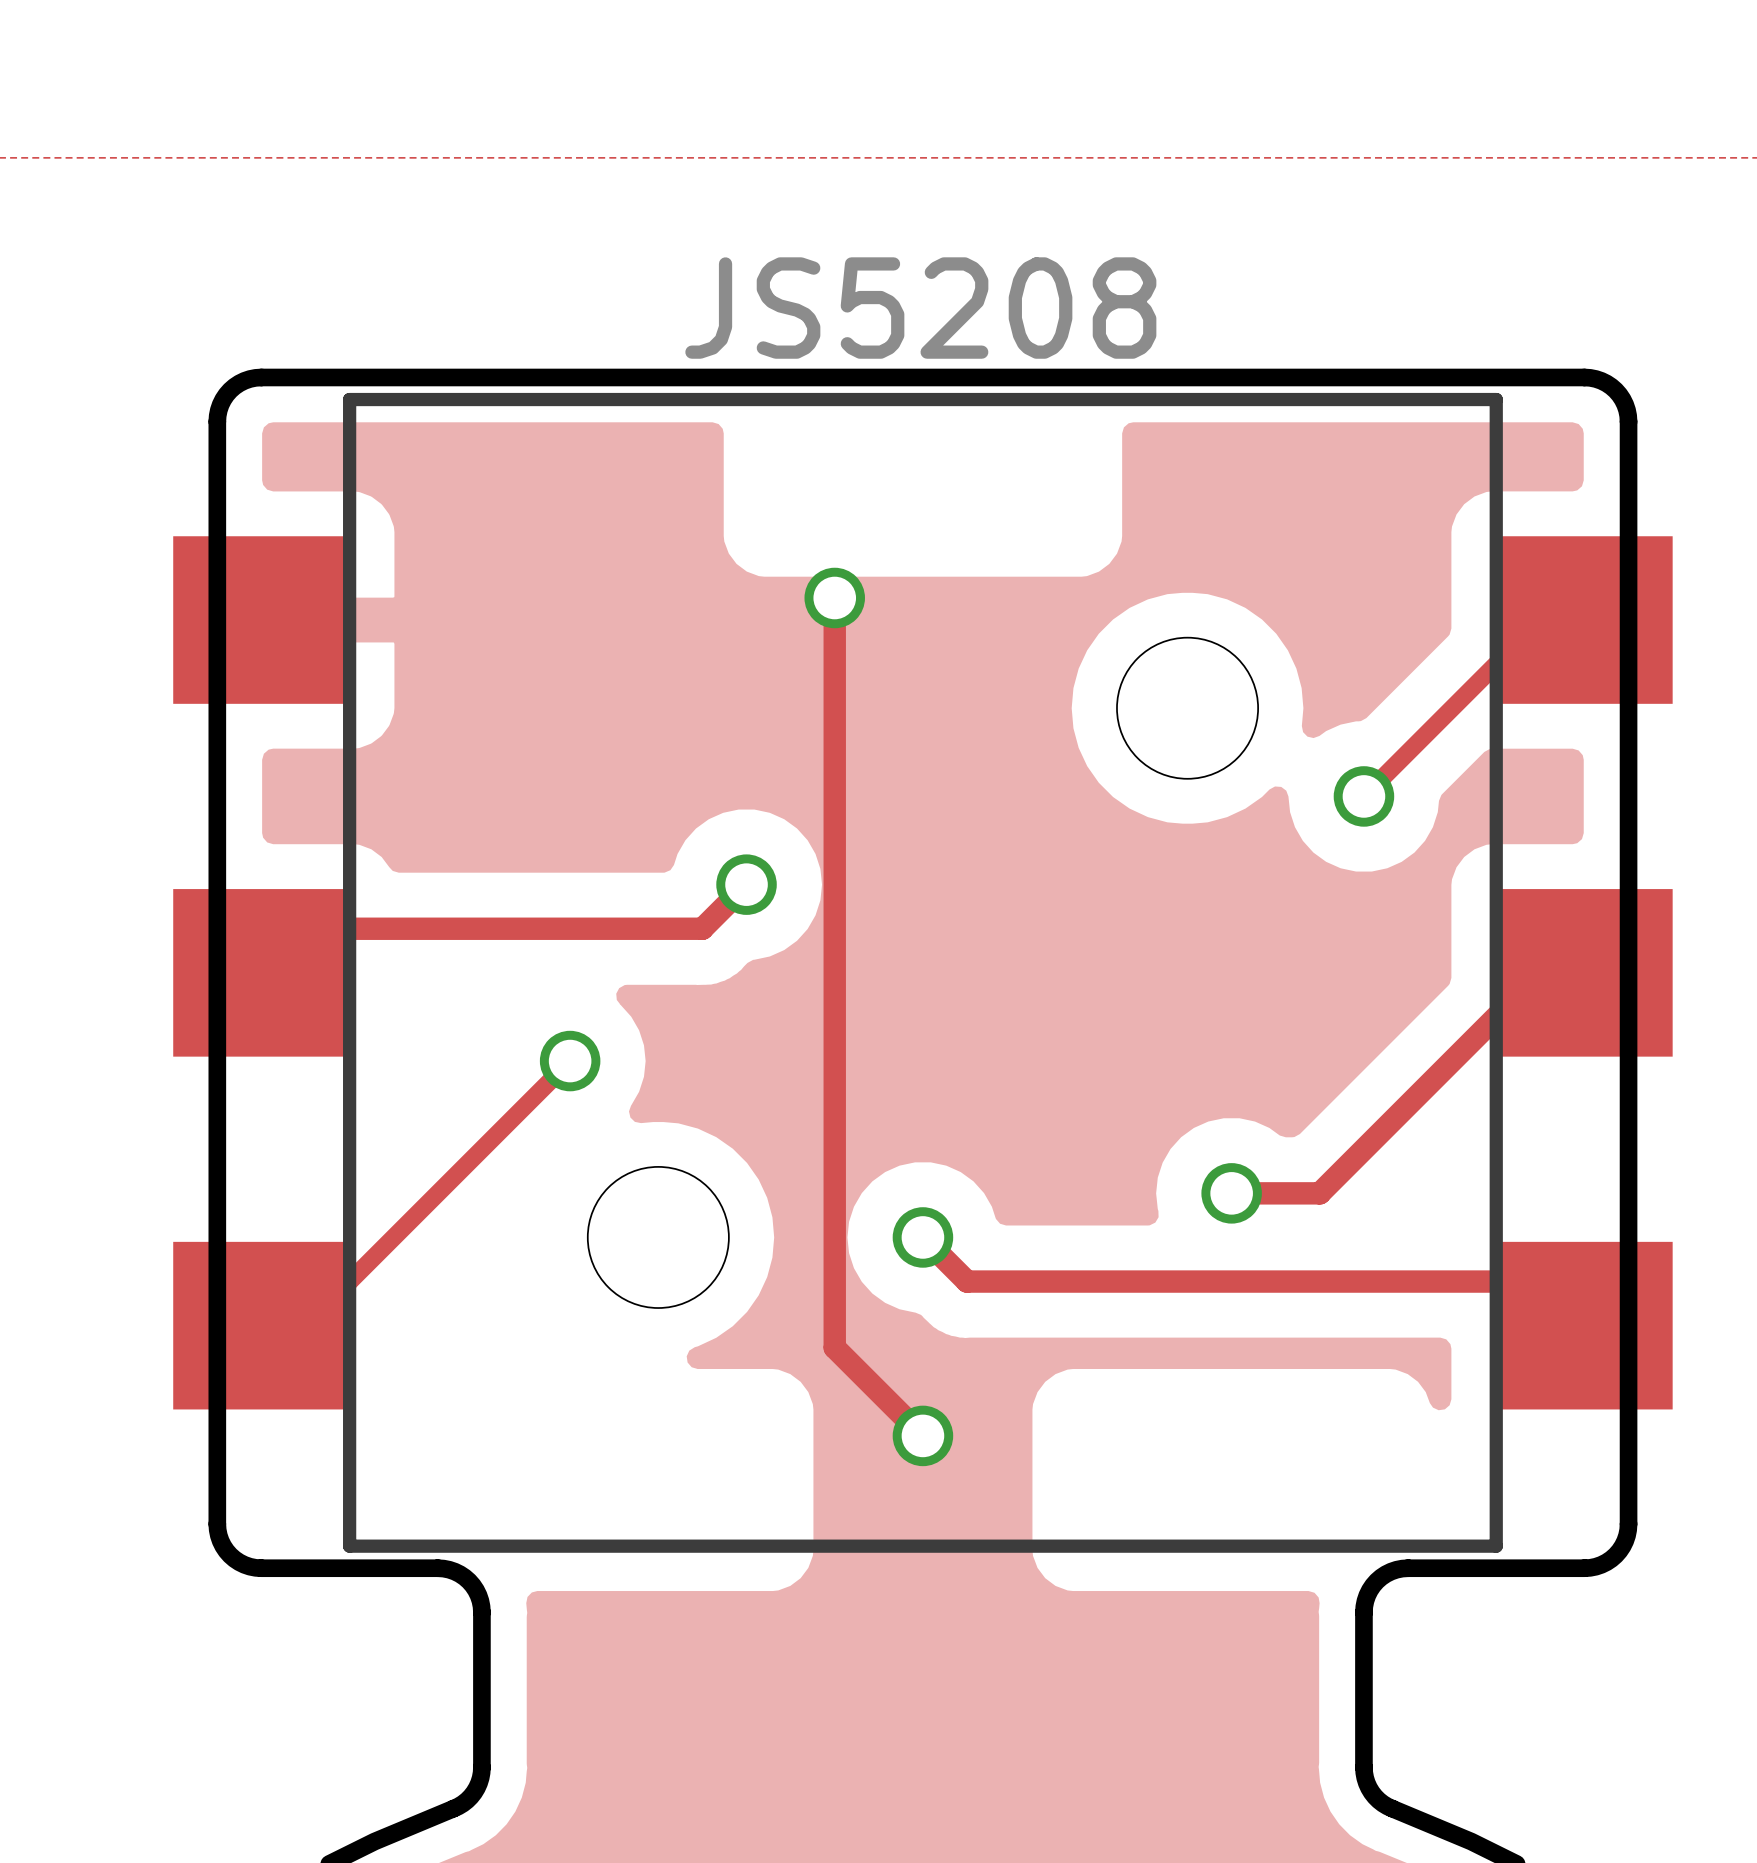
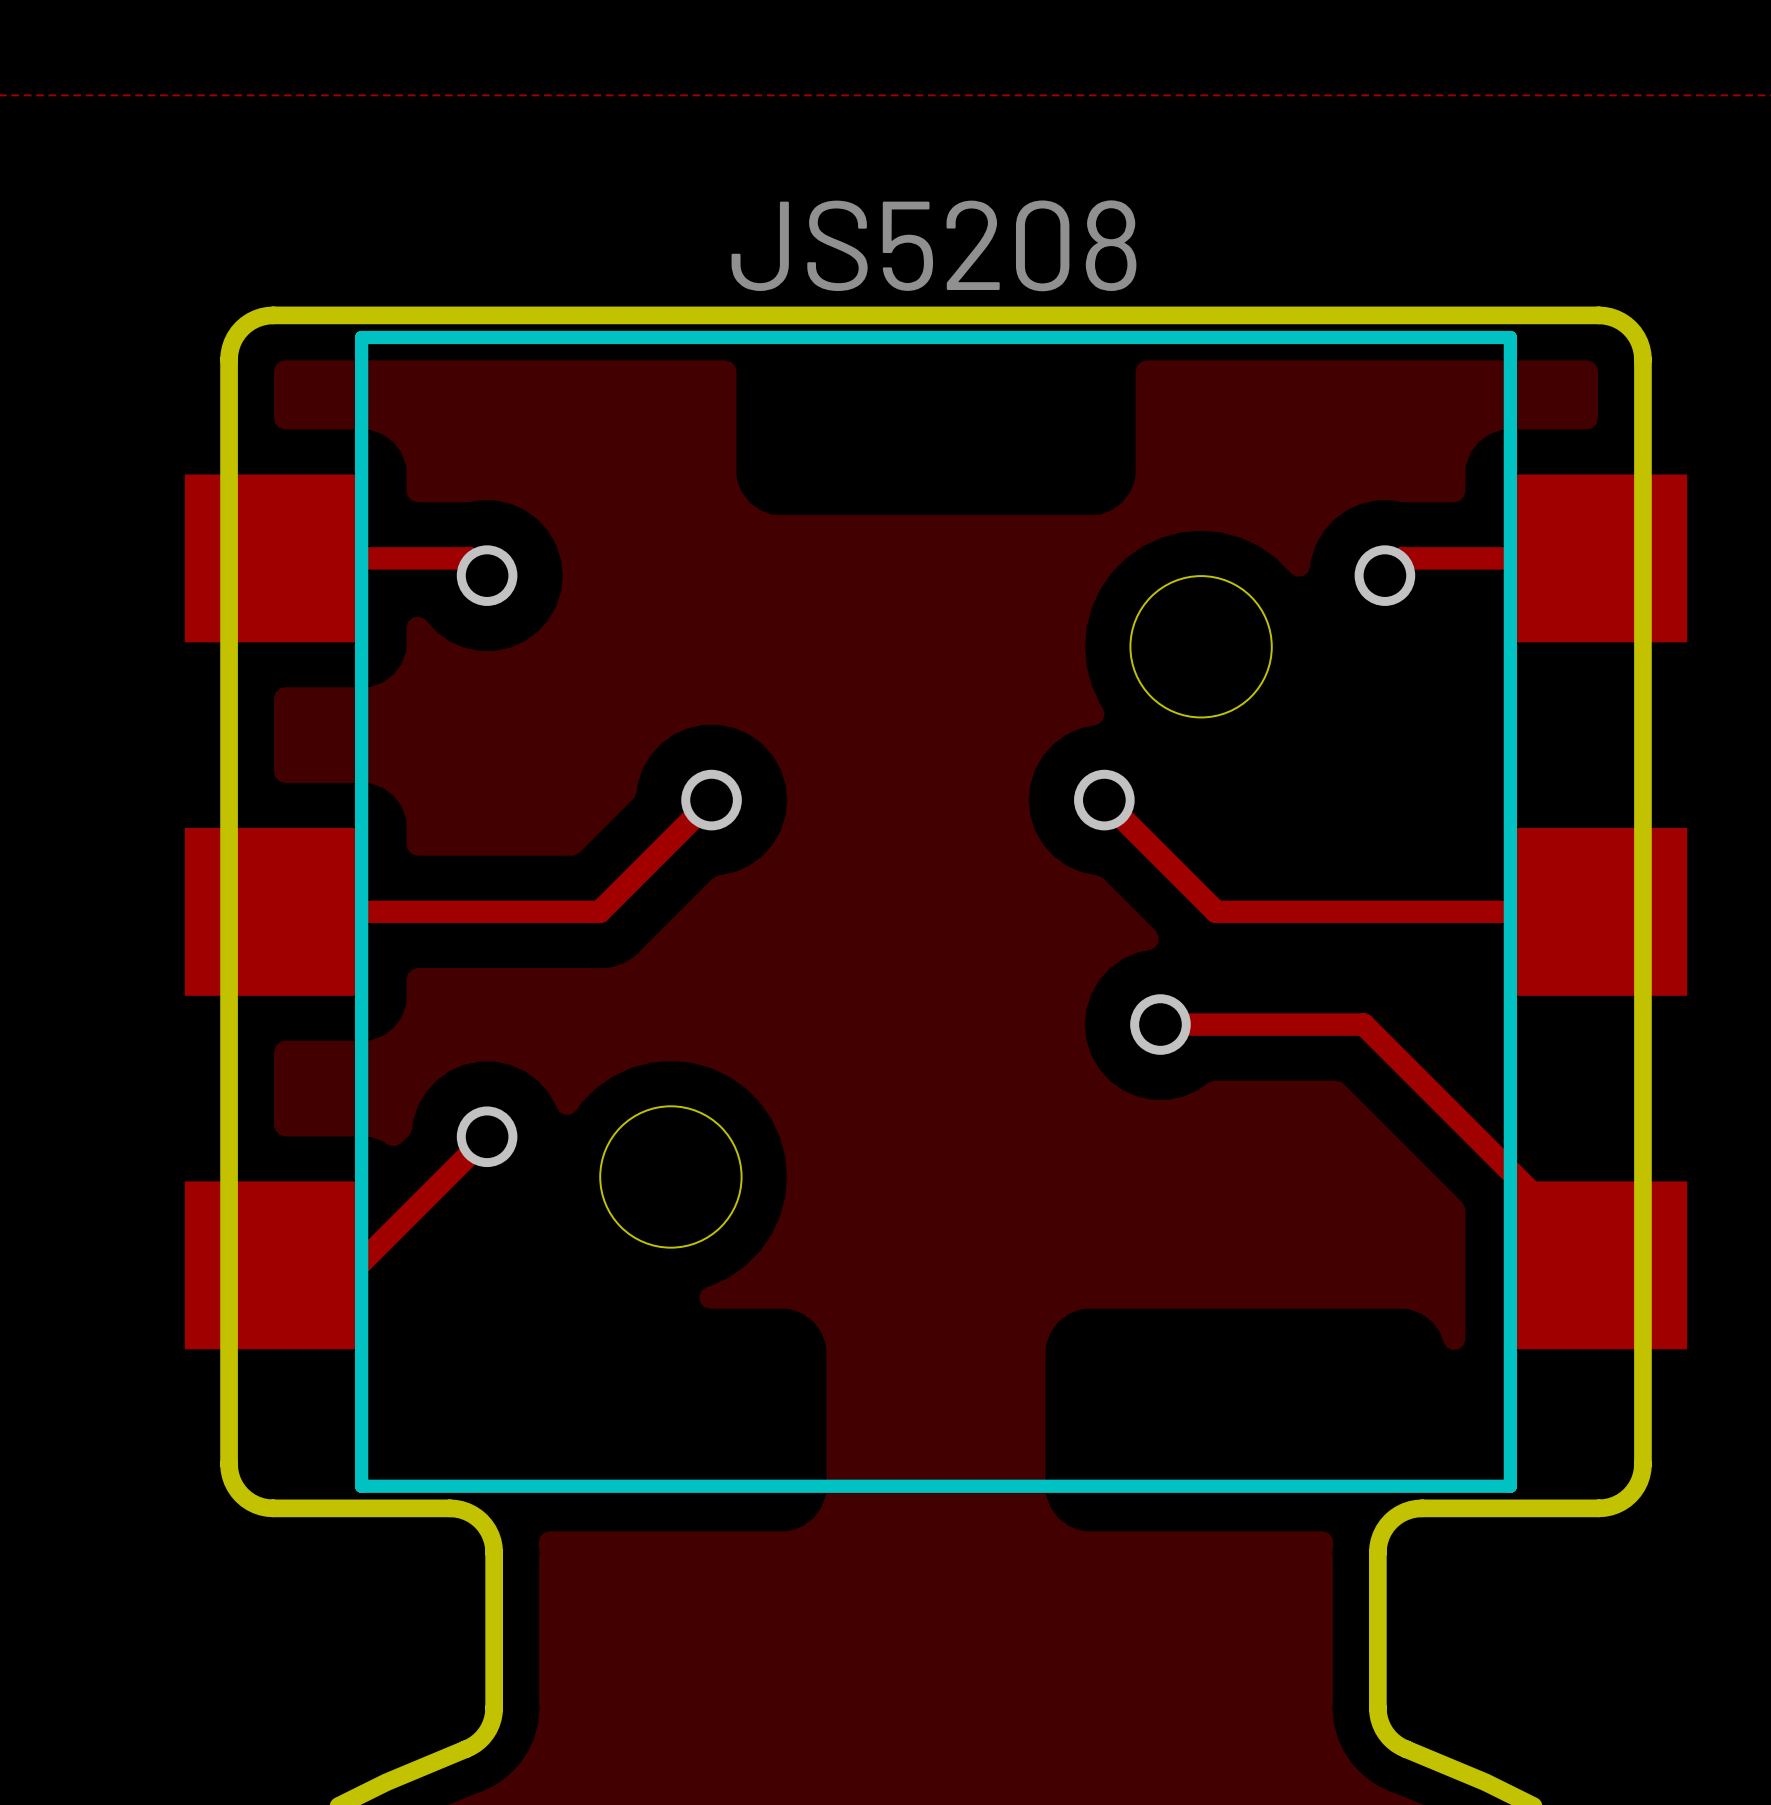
track: (1584, 575) (1363, 796) -> none
track: (834, 597) (834, 1347) (922, 1435) -> none
via: (834, 597) -> none
track: none -> (273, 558) (469, 558) (487, 575)
track: none -> (1598, 558) (1402, 558) (1384, 575)
via: none -> (487, 575)
via: none -> (1384, 575)
via: (1363, 796) -> none
track: none -> (711, 800) (599, 911) (273, 911)
track: none -> (1104, 800) (1216, 911) (1598, 911)
via: none -> (1104, 800)
track: (746, 884) (702, 928) (261, 928) -> none
via position: (746, 884) -> (711, 800)
track: (1584, 928) (1319, 1193) (1231, 1193) -> none
track: (570, 1061) (349, 1281) (261, 1281) -> none
via: (570, 1061) -> none
track: none -> (1160, 1024) (1363, 1024) (1598, 1259) (1598, 1265)
via: none -> (1160, 1024)
via: (1231, 1193) -> none
track: none -> (487, 1136) (358, 1265) (273, 1265)
via: none -> (487, 1136)
track: (922, 1237) (967, 1281) (1584, 1281) -> none
via: (922, 1237) -> none
via: (922, 1435) -> none

